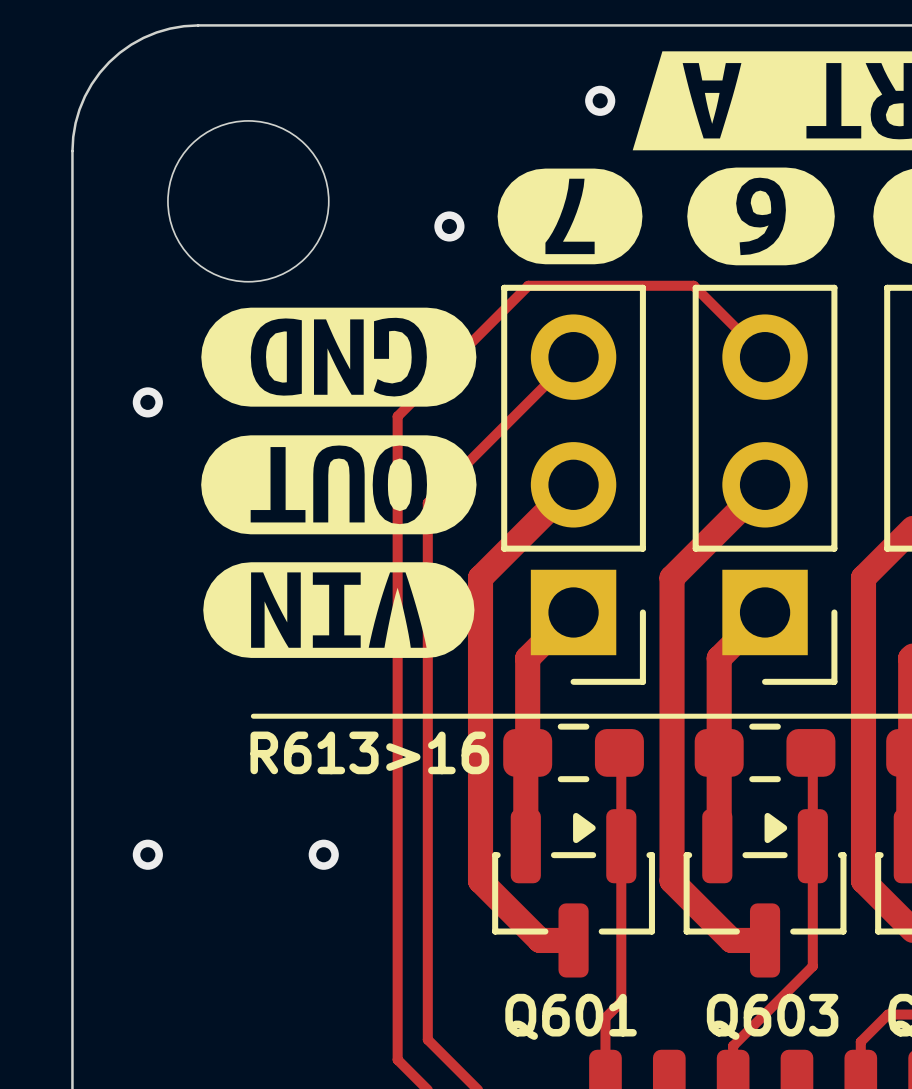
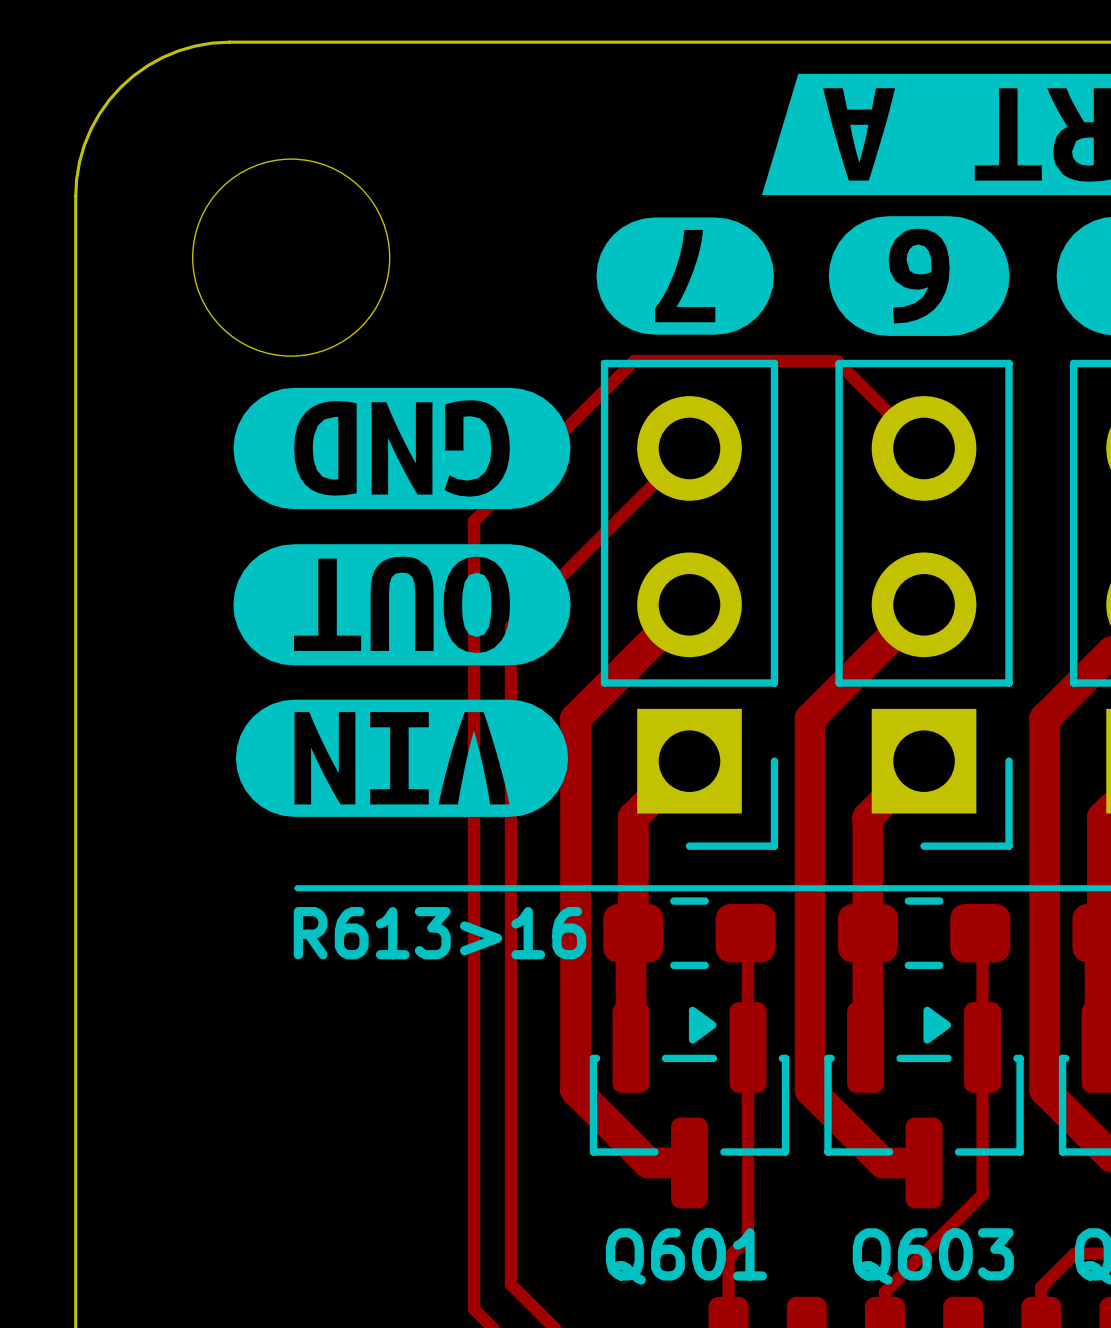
via: (600, 100) -> none
via: (449, 226) -> none
via: (147, 402) -> none
via: (147, 854) -> none
via: (323, 854) -> none

